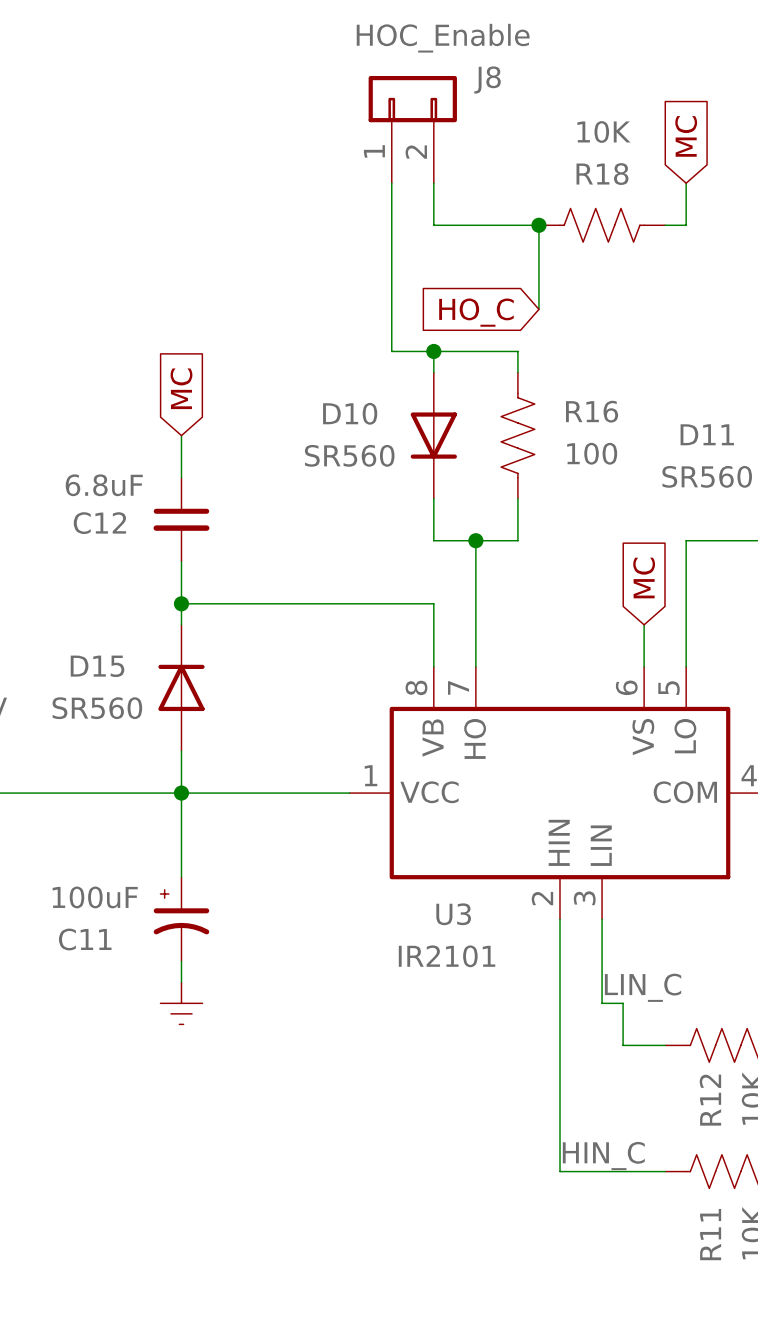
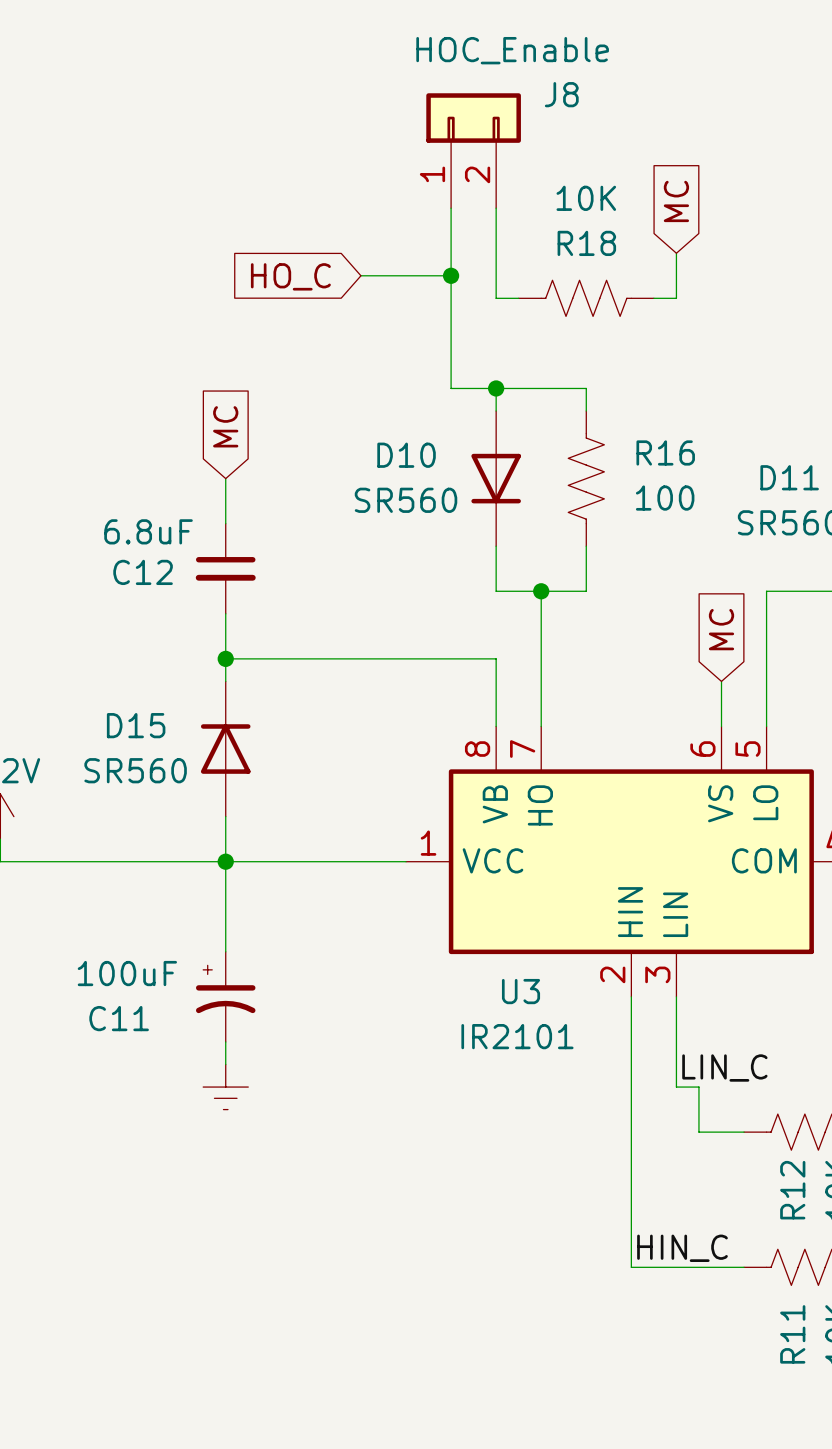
global label position: MC (686, 136) -> MC (676, 201)
wire: (686, 183) (686, 225) (665, 225) -> (676, 253) (676, 298) (653, 298)
wire: (433, 225) (538, 225) (538, 309) -> (496, 253) (496, 298) (518, 298)
junction: (538, 225) -> none
R18 position: (602, 225) -> (586, 298)
wire: none -> (360, 275) (451, 275)
junction: none -> (451, 275)
global label position: HO_C (476, 312) -> HO_C (290, 276)

